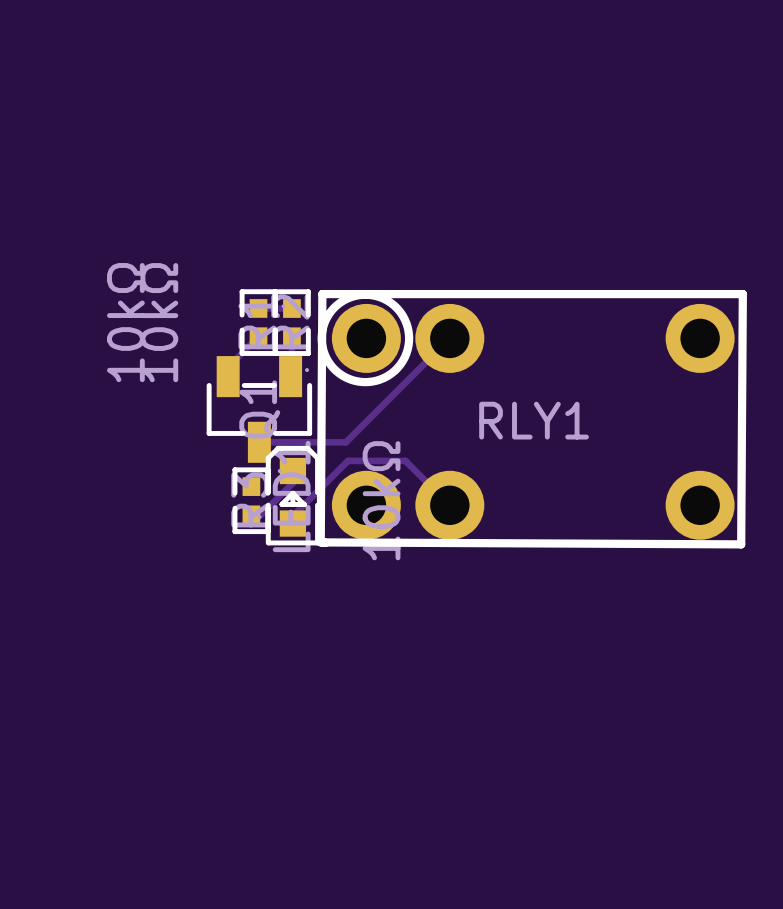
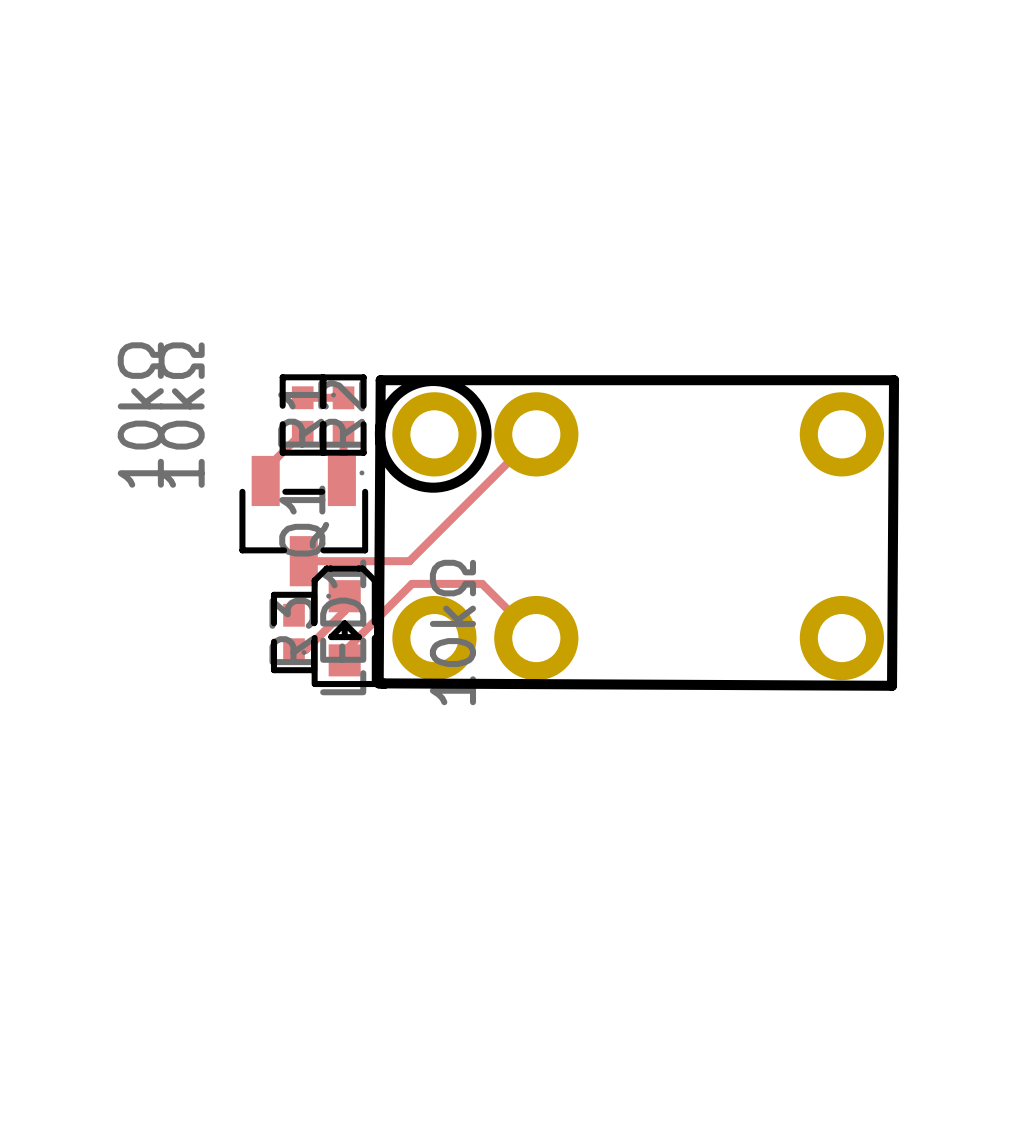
RLY1 name: RLY1 (534, 420) -> none

